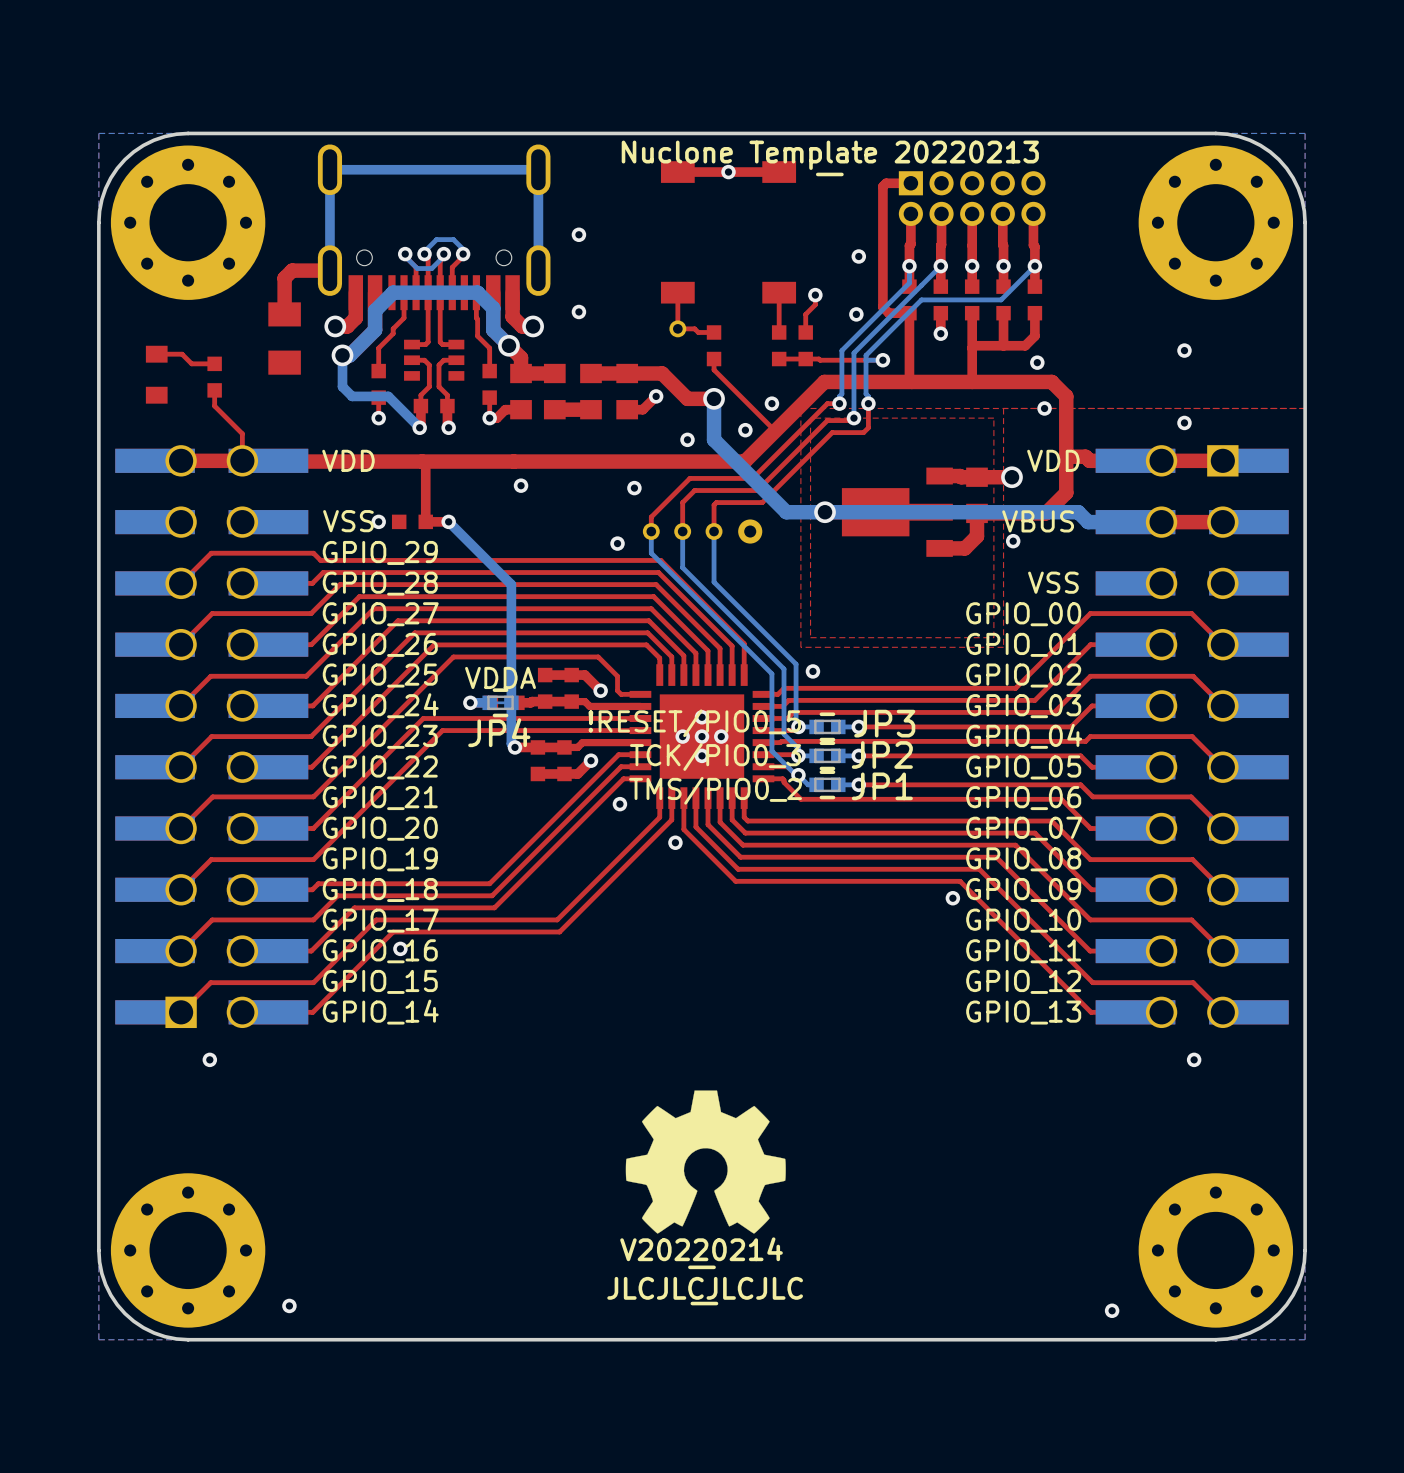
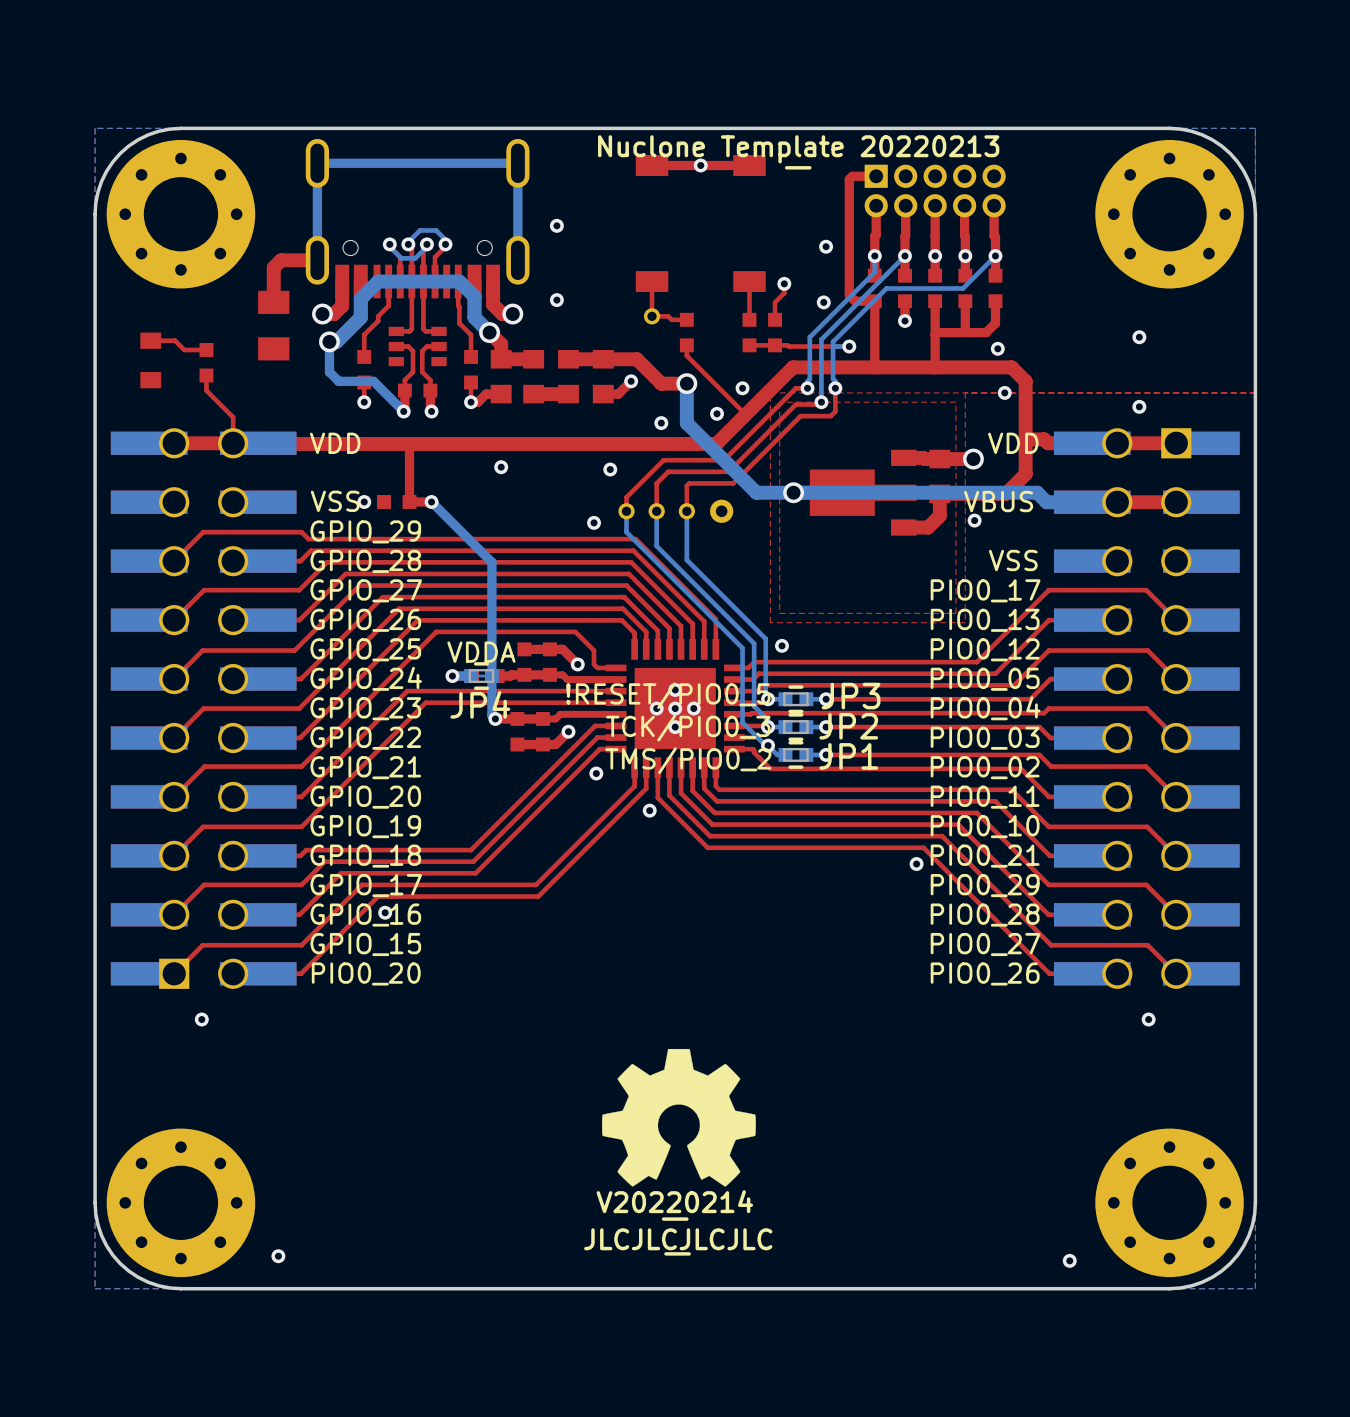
part footprint: [1095, 445, 1289, 1029] -> [1053, 428, 1240, 989]
part text: GPIO_14 (380, 1012) -> PIO0_20 (366, 973)

